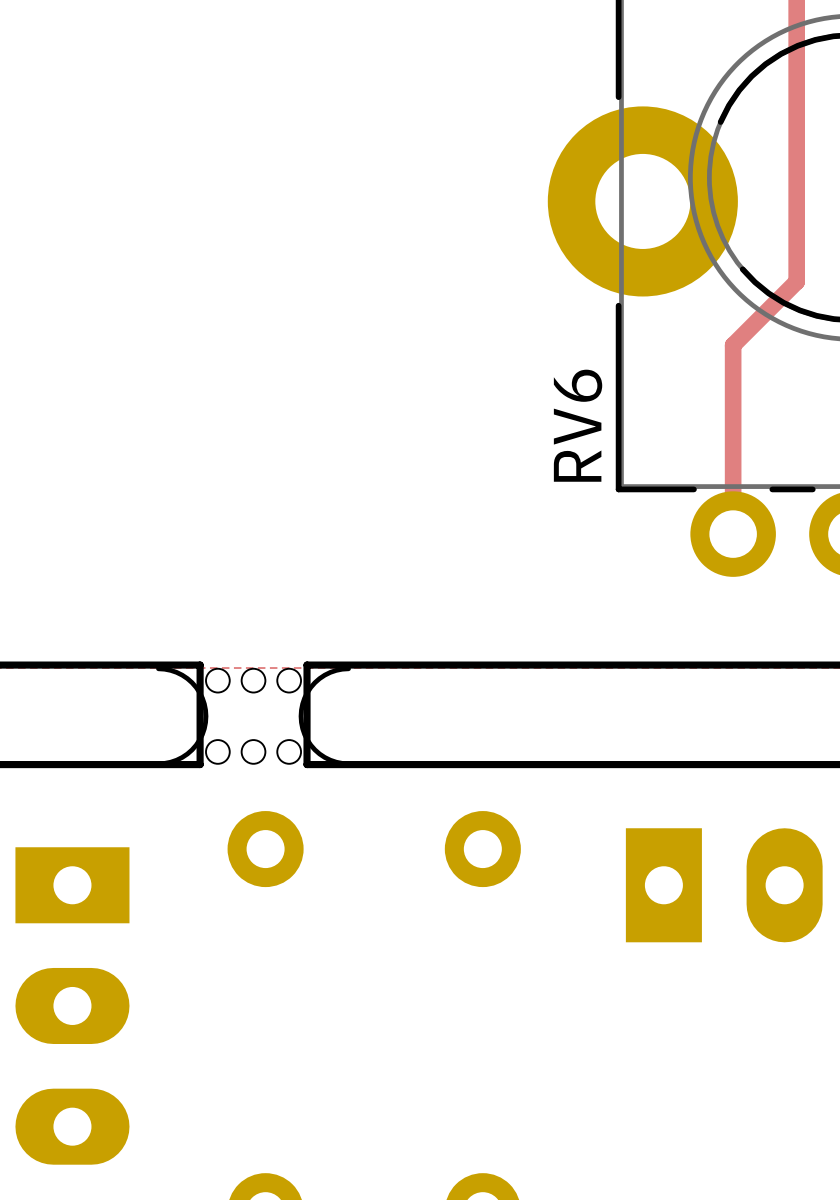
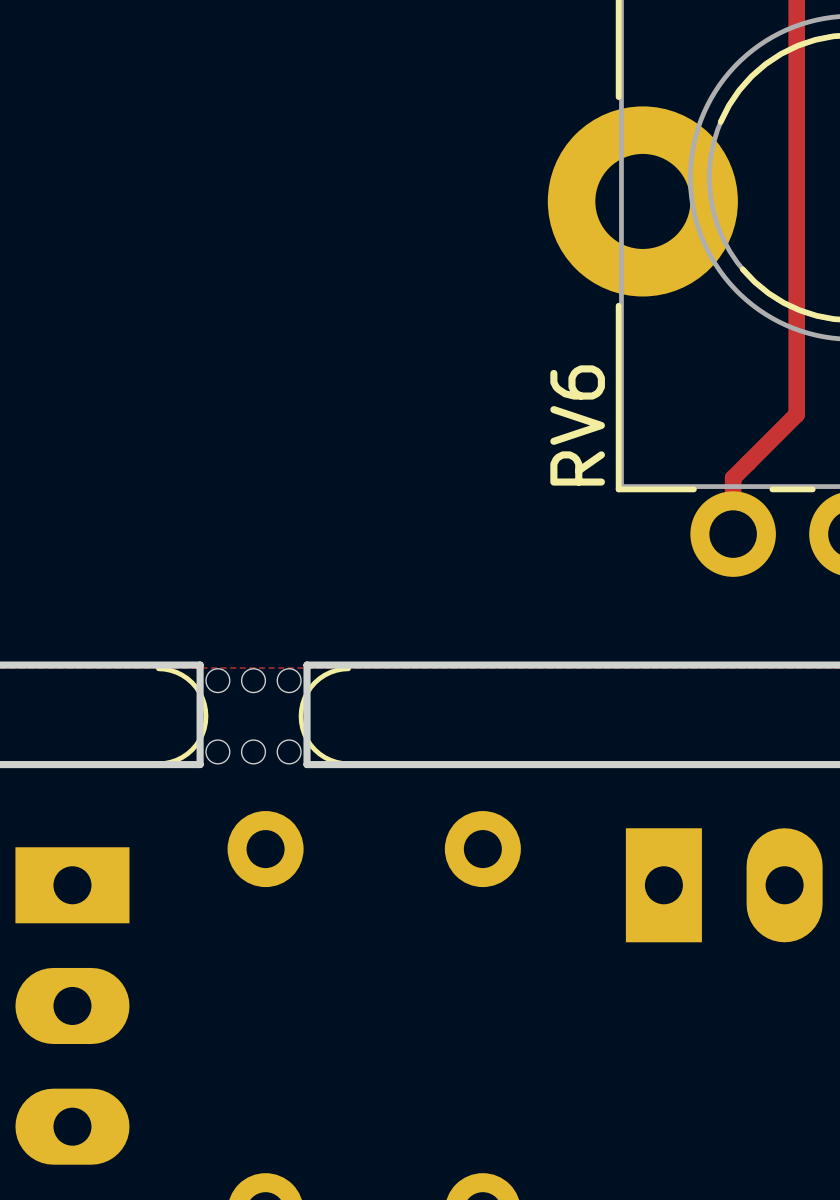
track: (796, 281) (733, 345) (733, 478) -> (796, 281) (796, 414) (733, 478)

